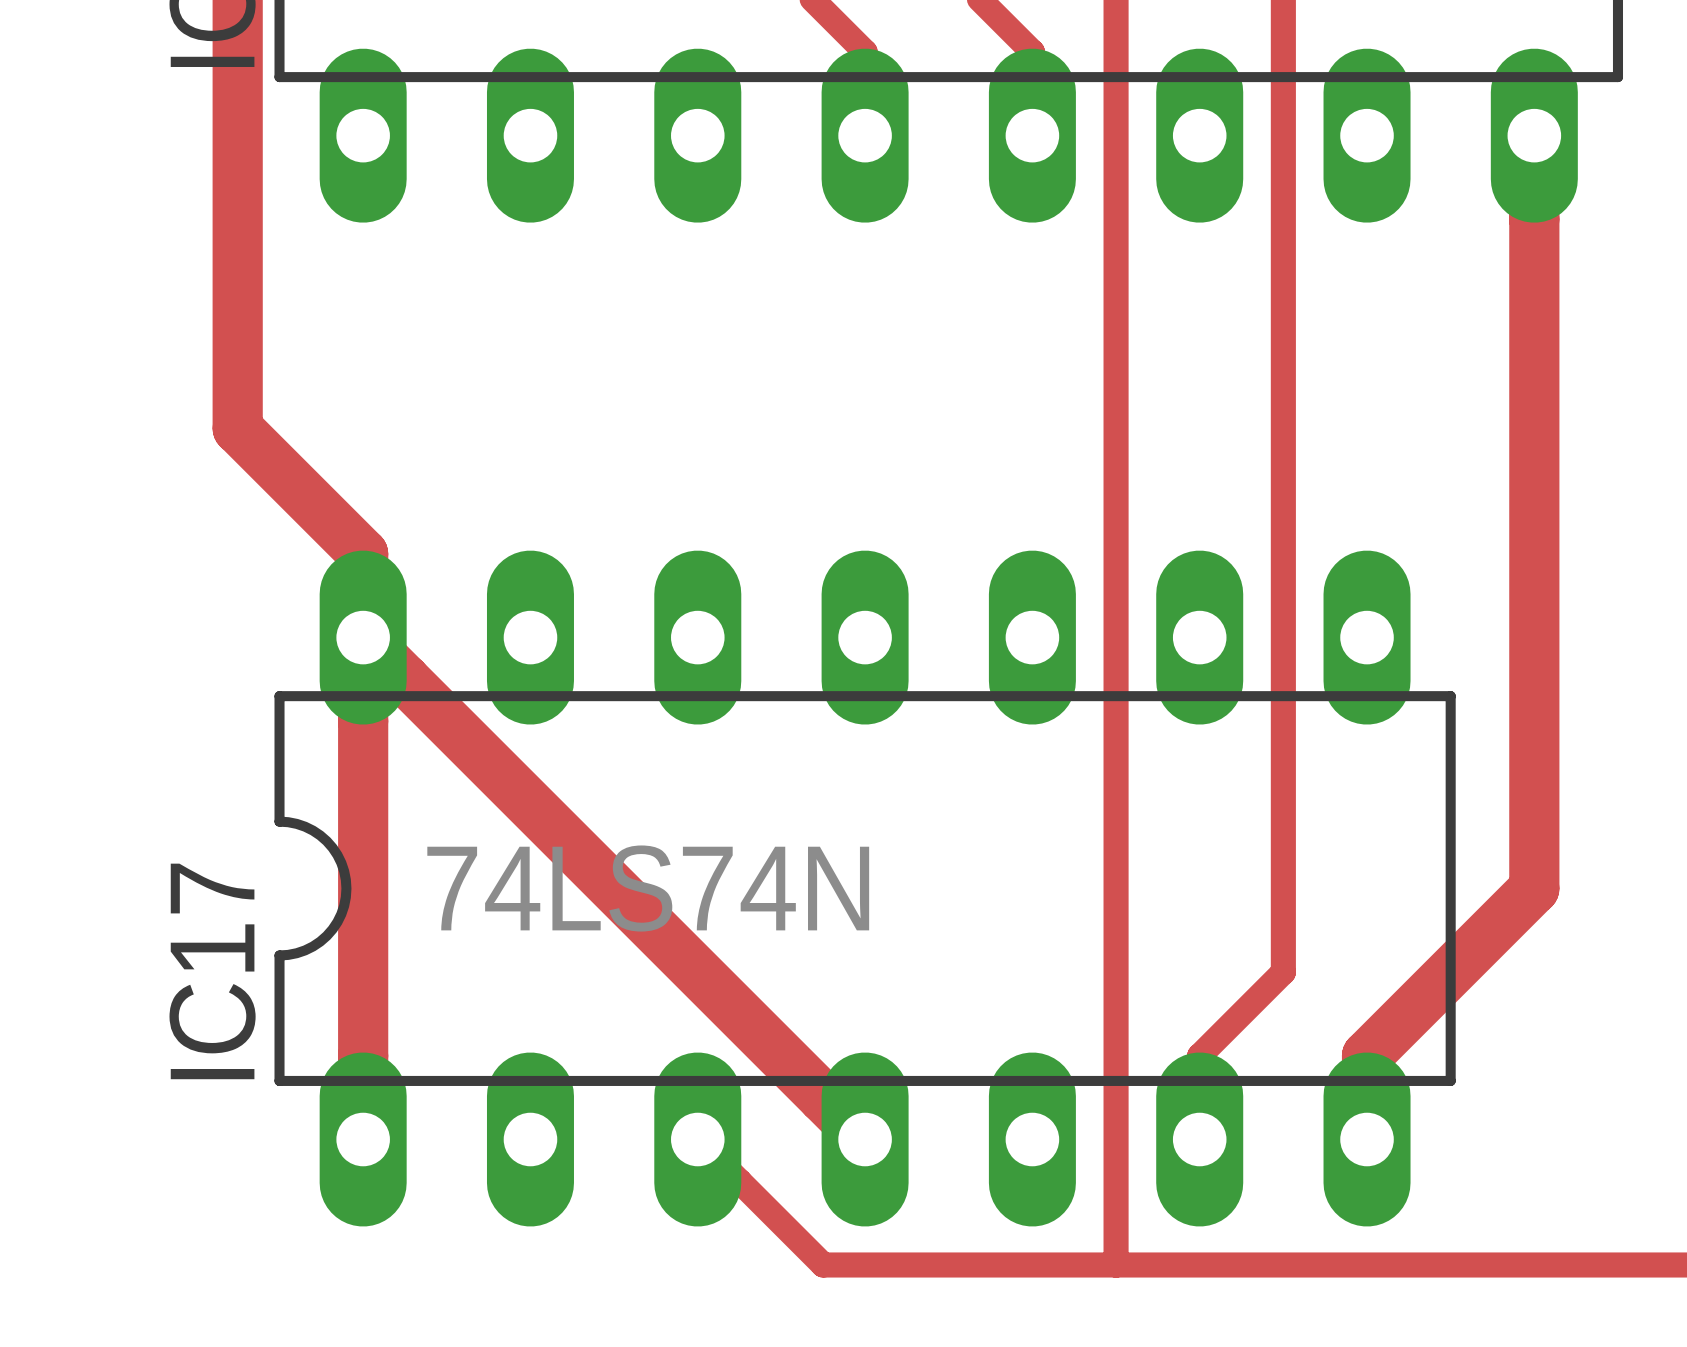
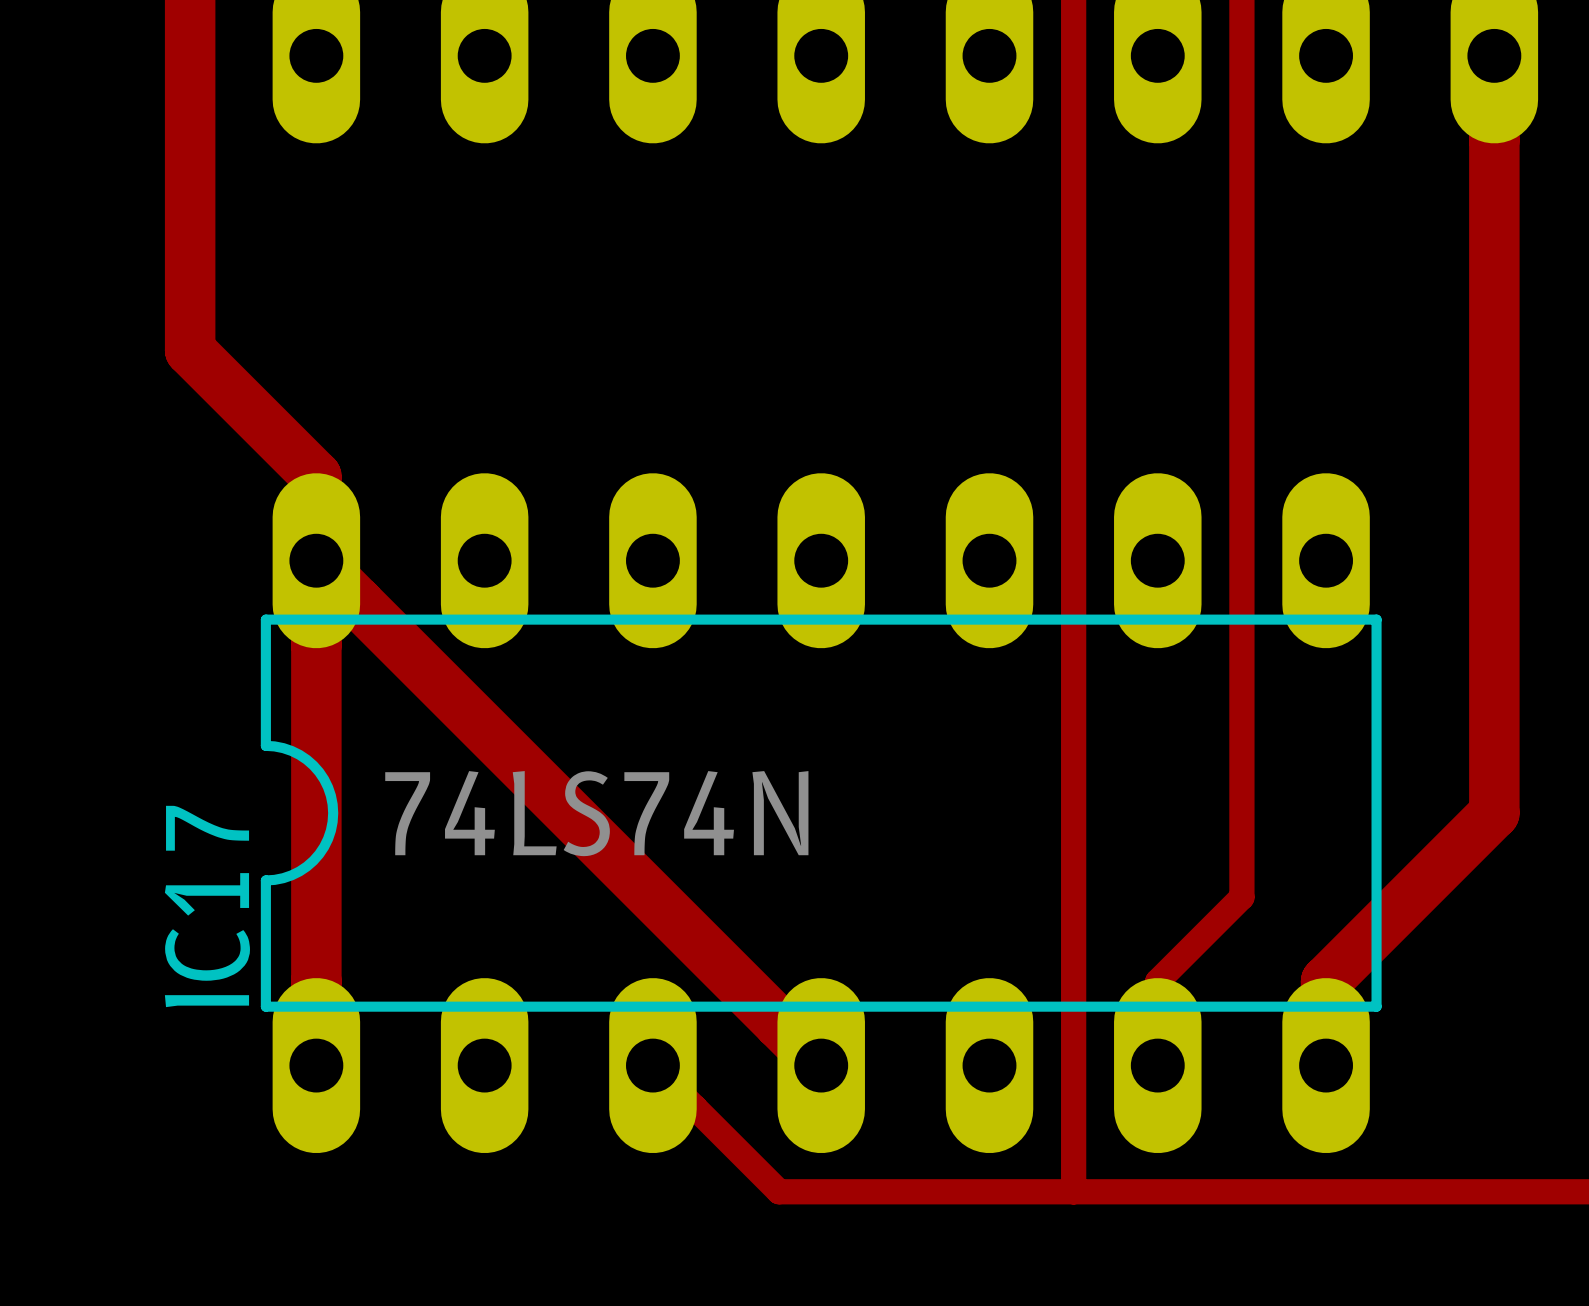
IC17 footprint: [274, 550, 1456, 1227] -> [260, 473, 1382, 1154]
IC17 name position: IC17 (212, 971) -> IC17 (207, 906)

